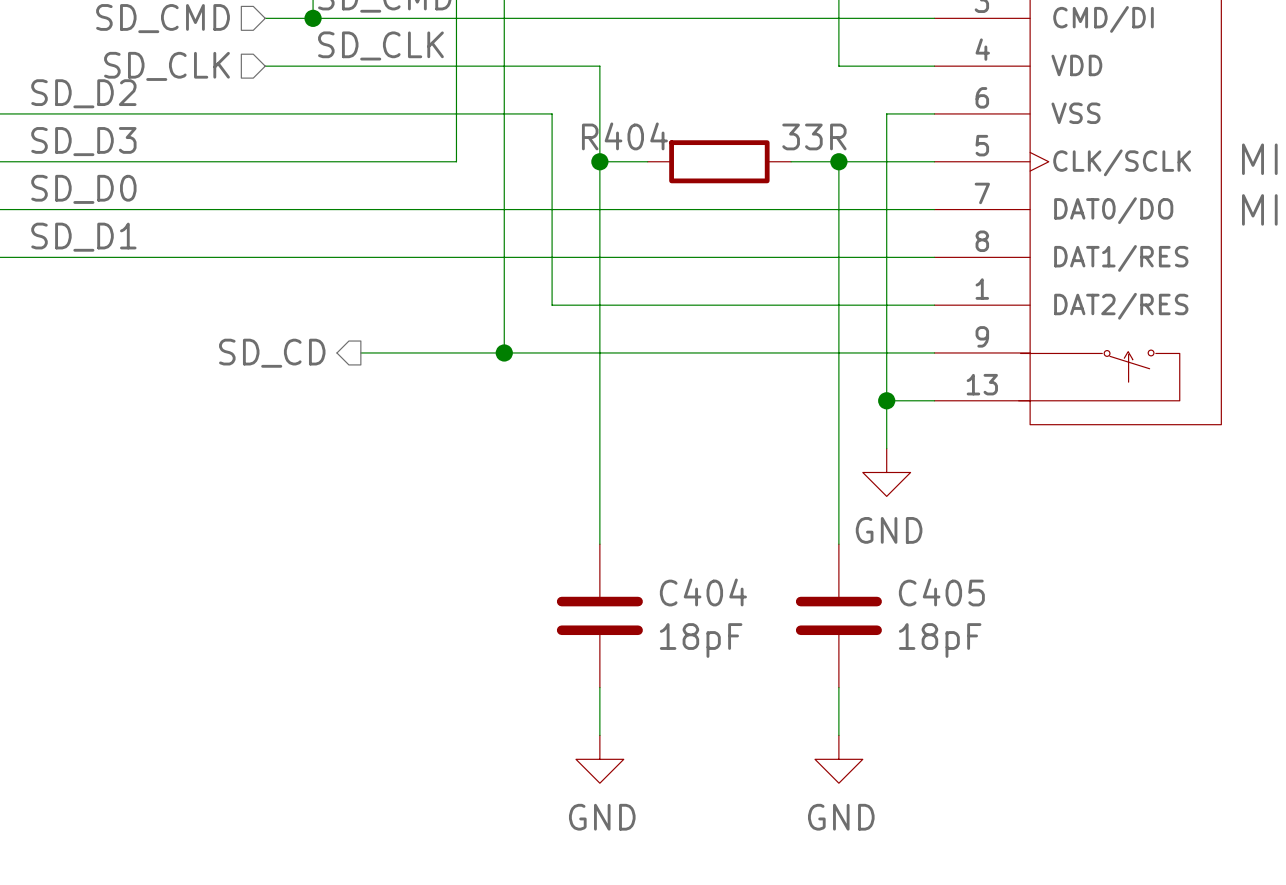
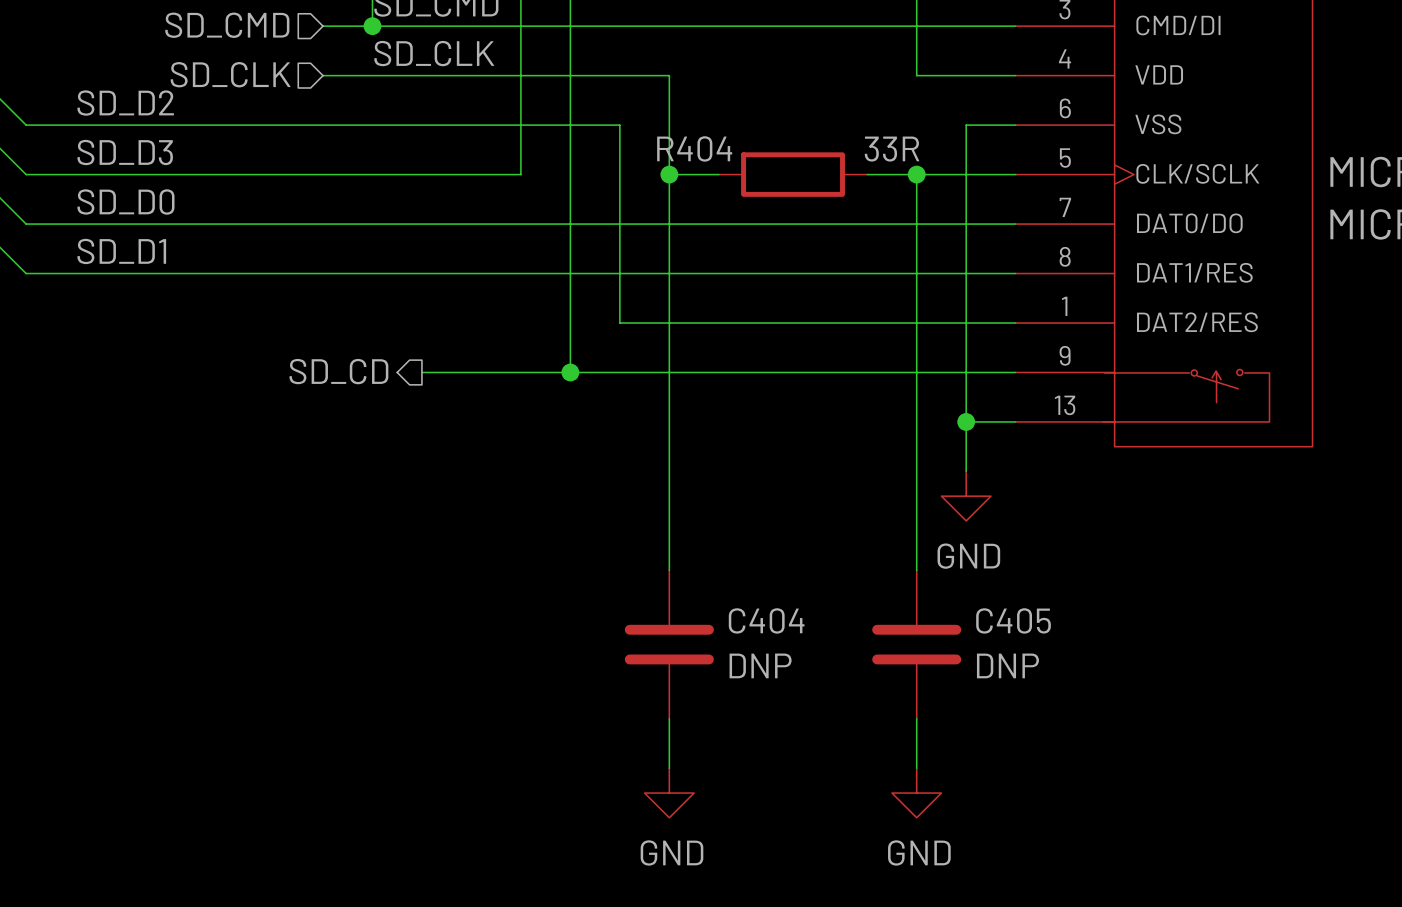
C404 value: 18pF (701, 640) -> DNP (760, 665)
C405 value: 18pF (940, 640) -> DNP (1007, 665)

